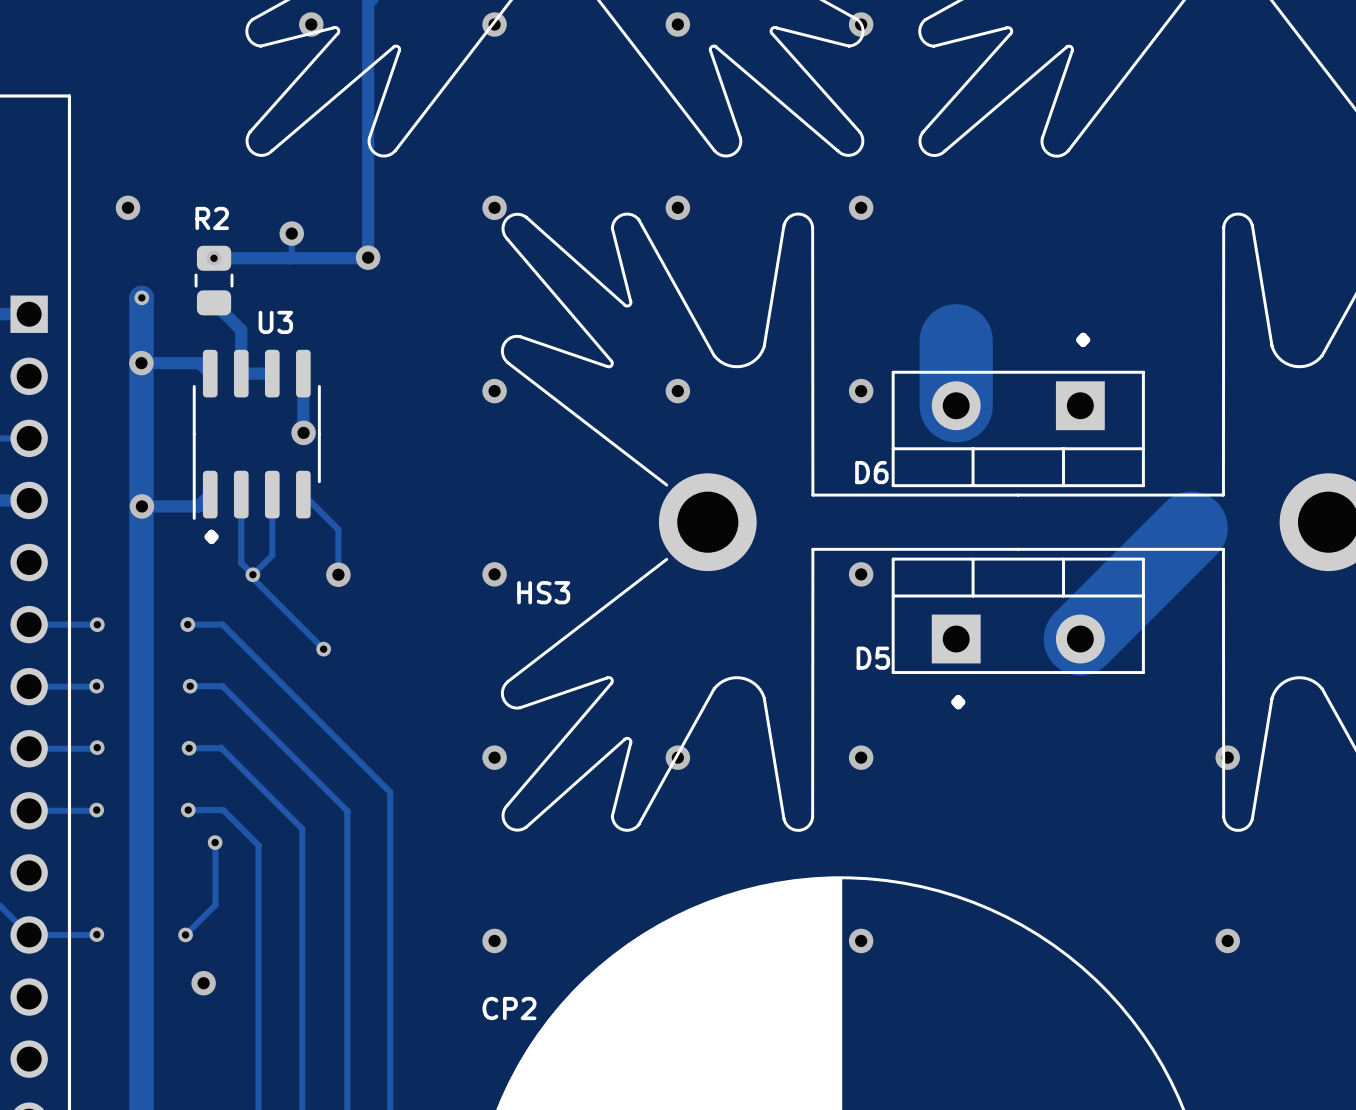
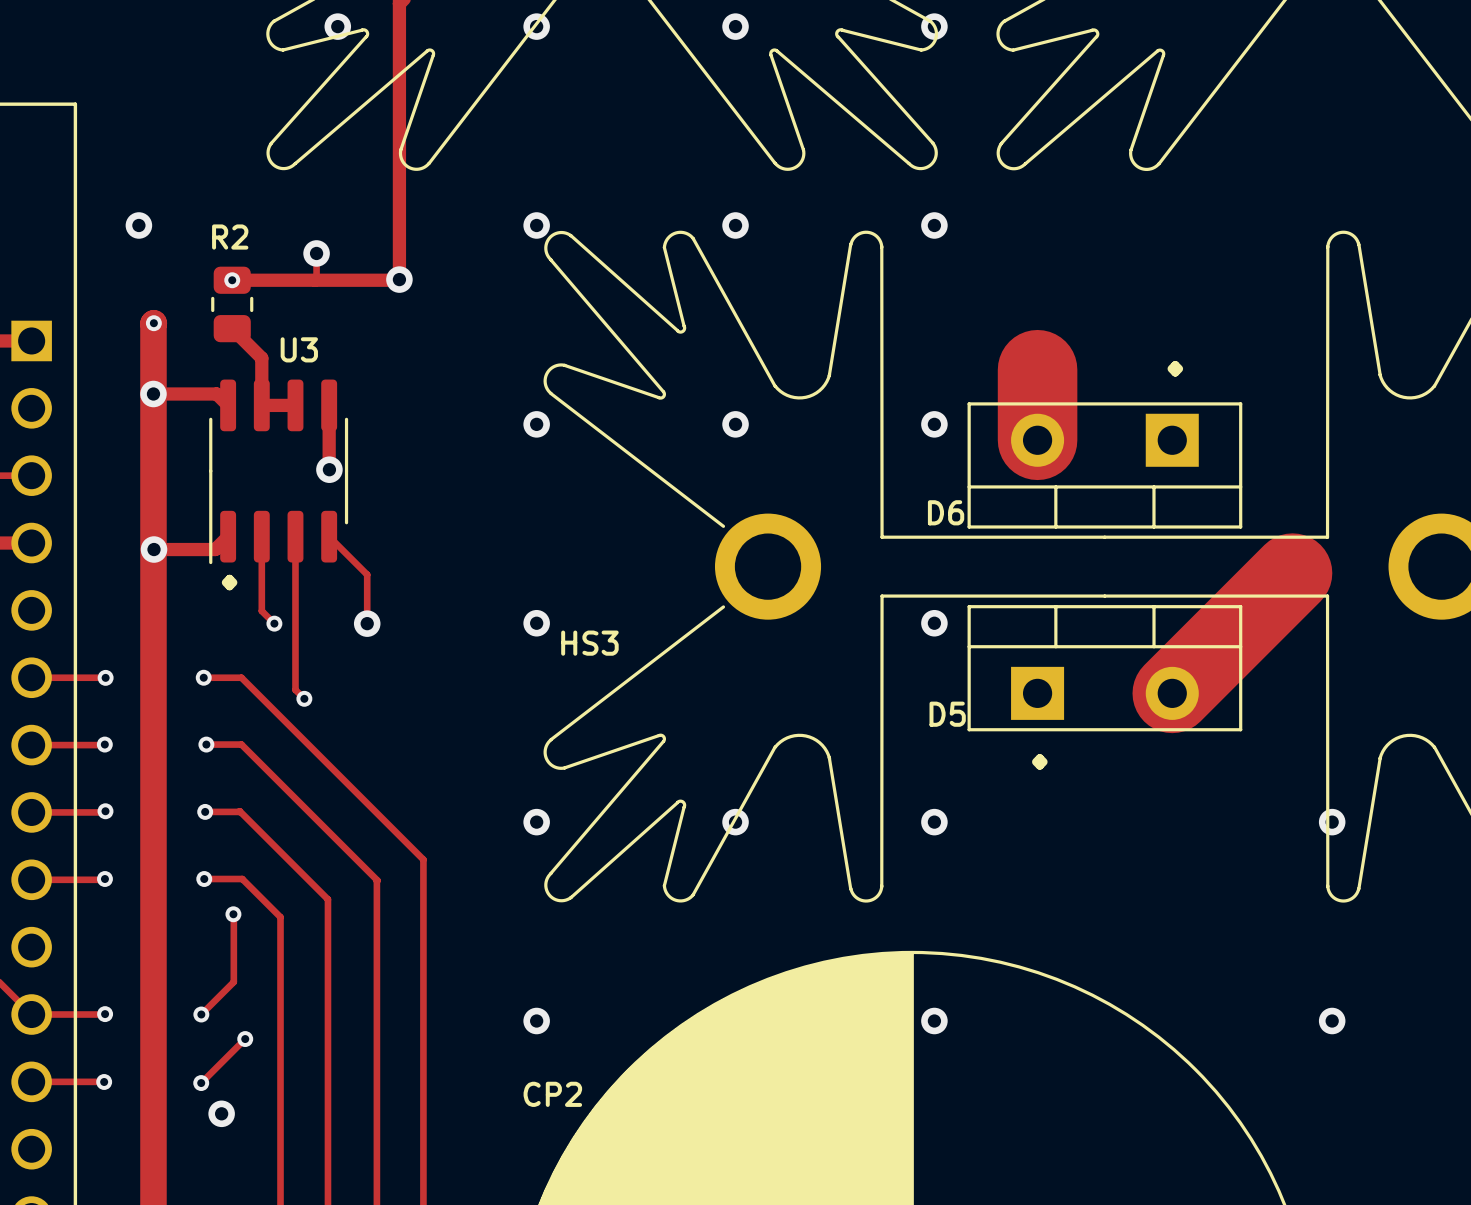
track: (272, 555) (252, 574) (252, 578) (323, 649) -> (295, 602) (295, 689) (304, 698)
via position: (323, 649) -> (304, 698)
track: none -> (245, 1039) (201, 1083)
via: none -> (245, 1039)
via position: (203, 983) -> (221, 1113)
track: none -> (31, 1081) (104, 1081)
via: none -> (104, 1081)
via: none -> (201, 1083)

